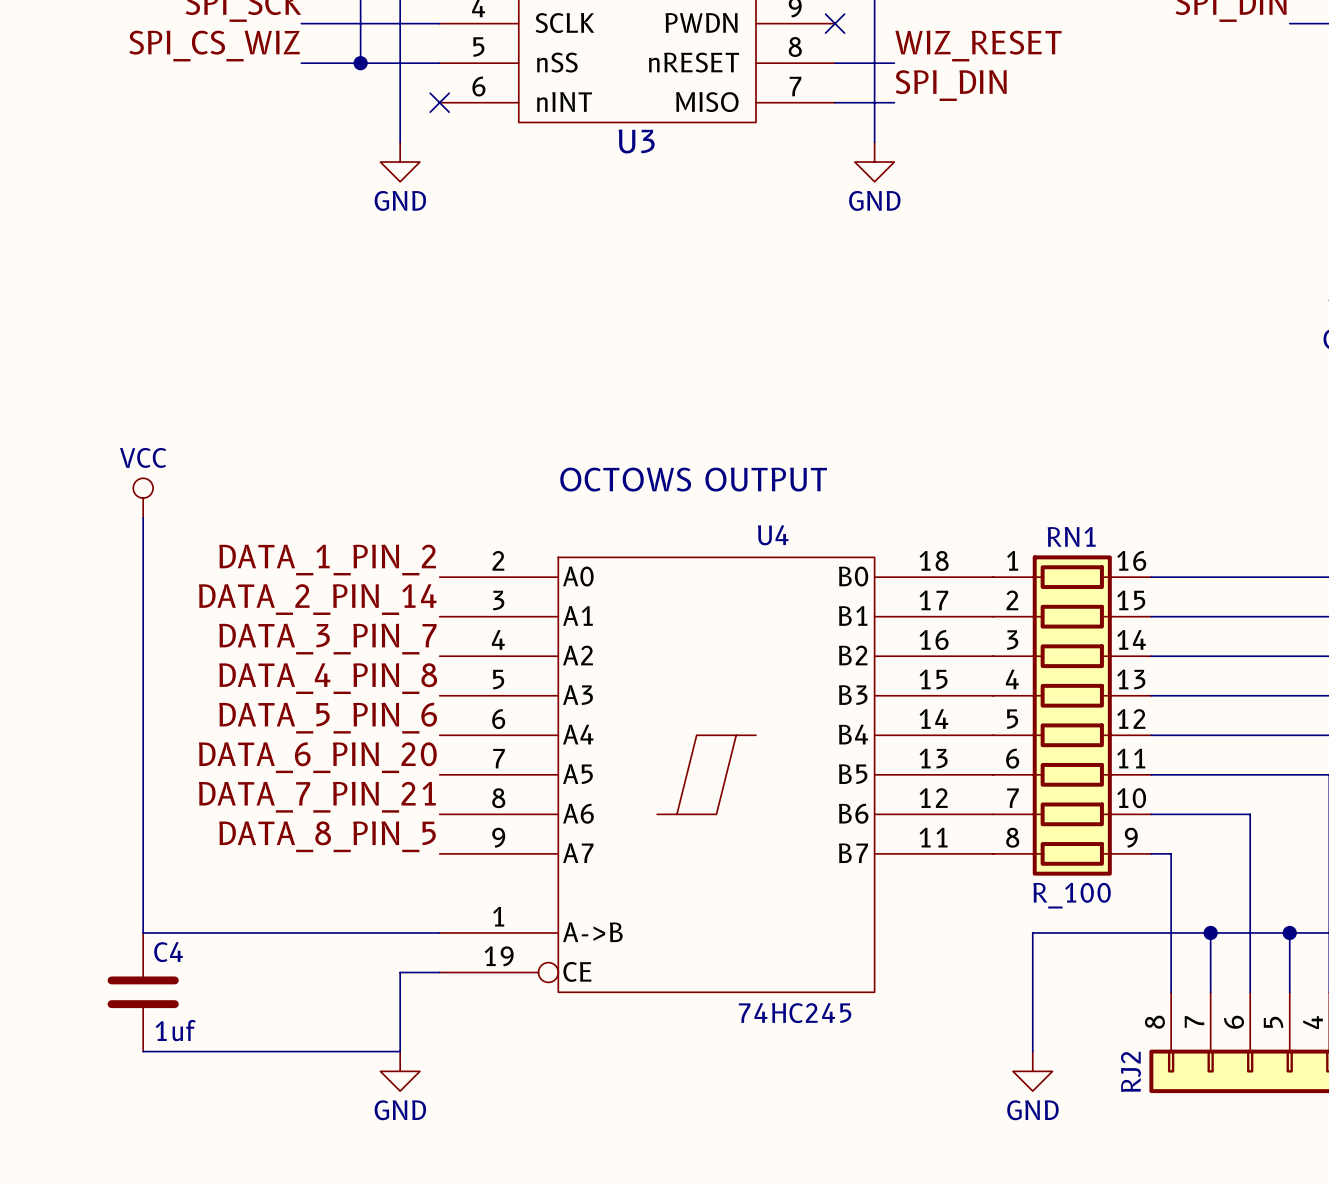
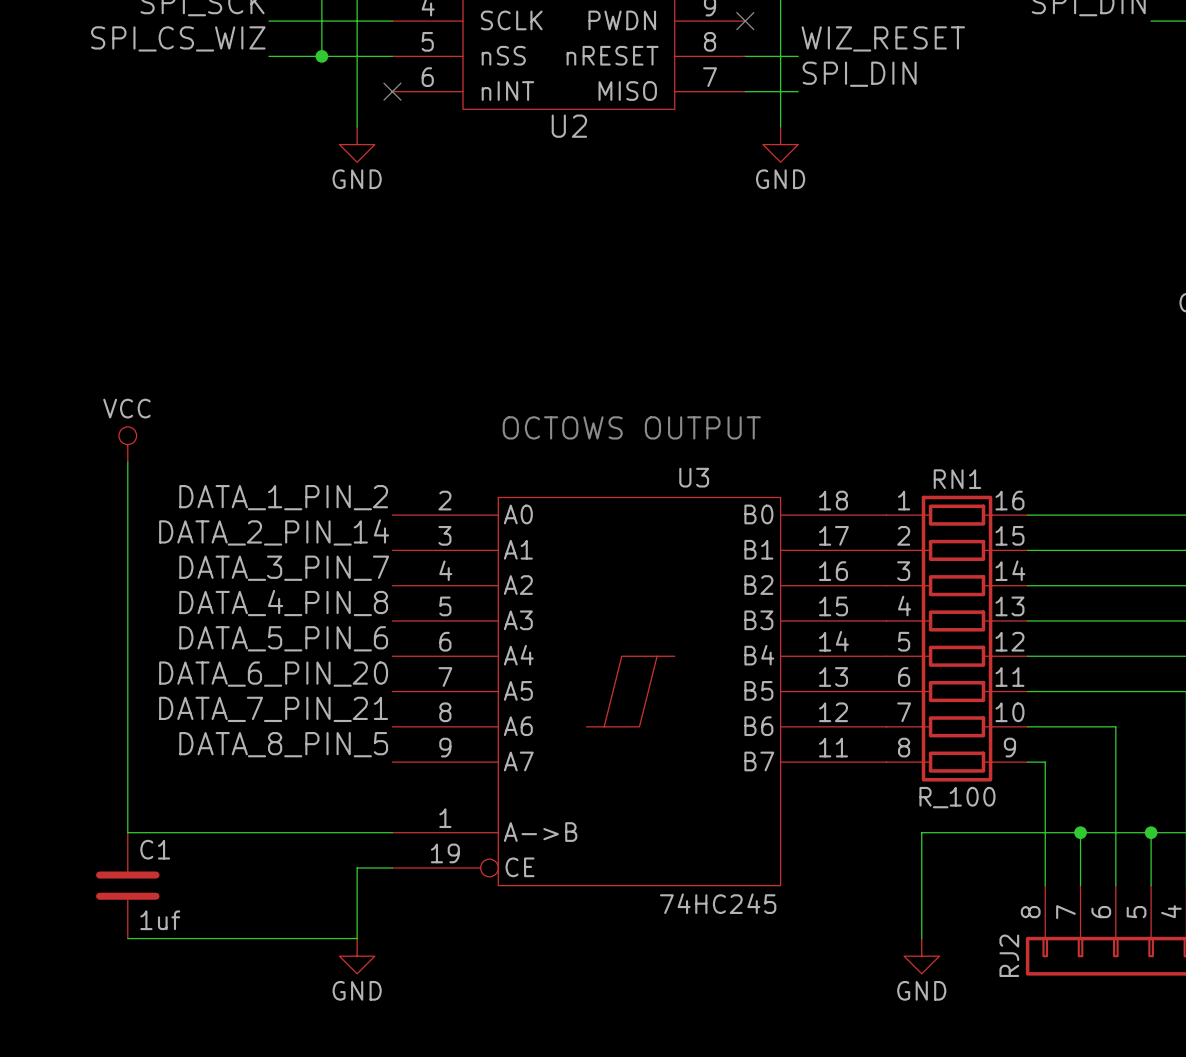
U3 name: U3 (636, 141) -> U2 (569, 126)
U4 name: U4 (773, 535) -> U3 (694, 477)
C4 name: C4 (168, 952) -> C1 (155, 849)

